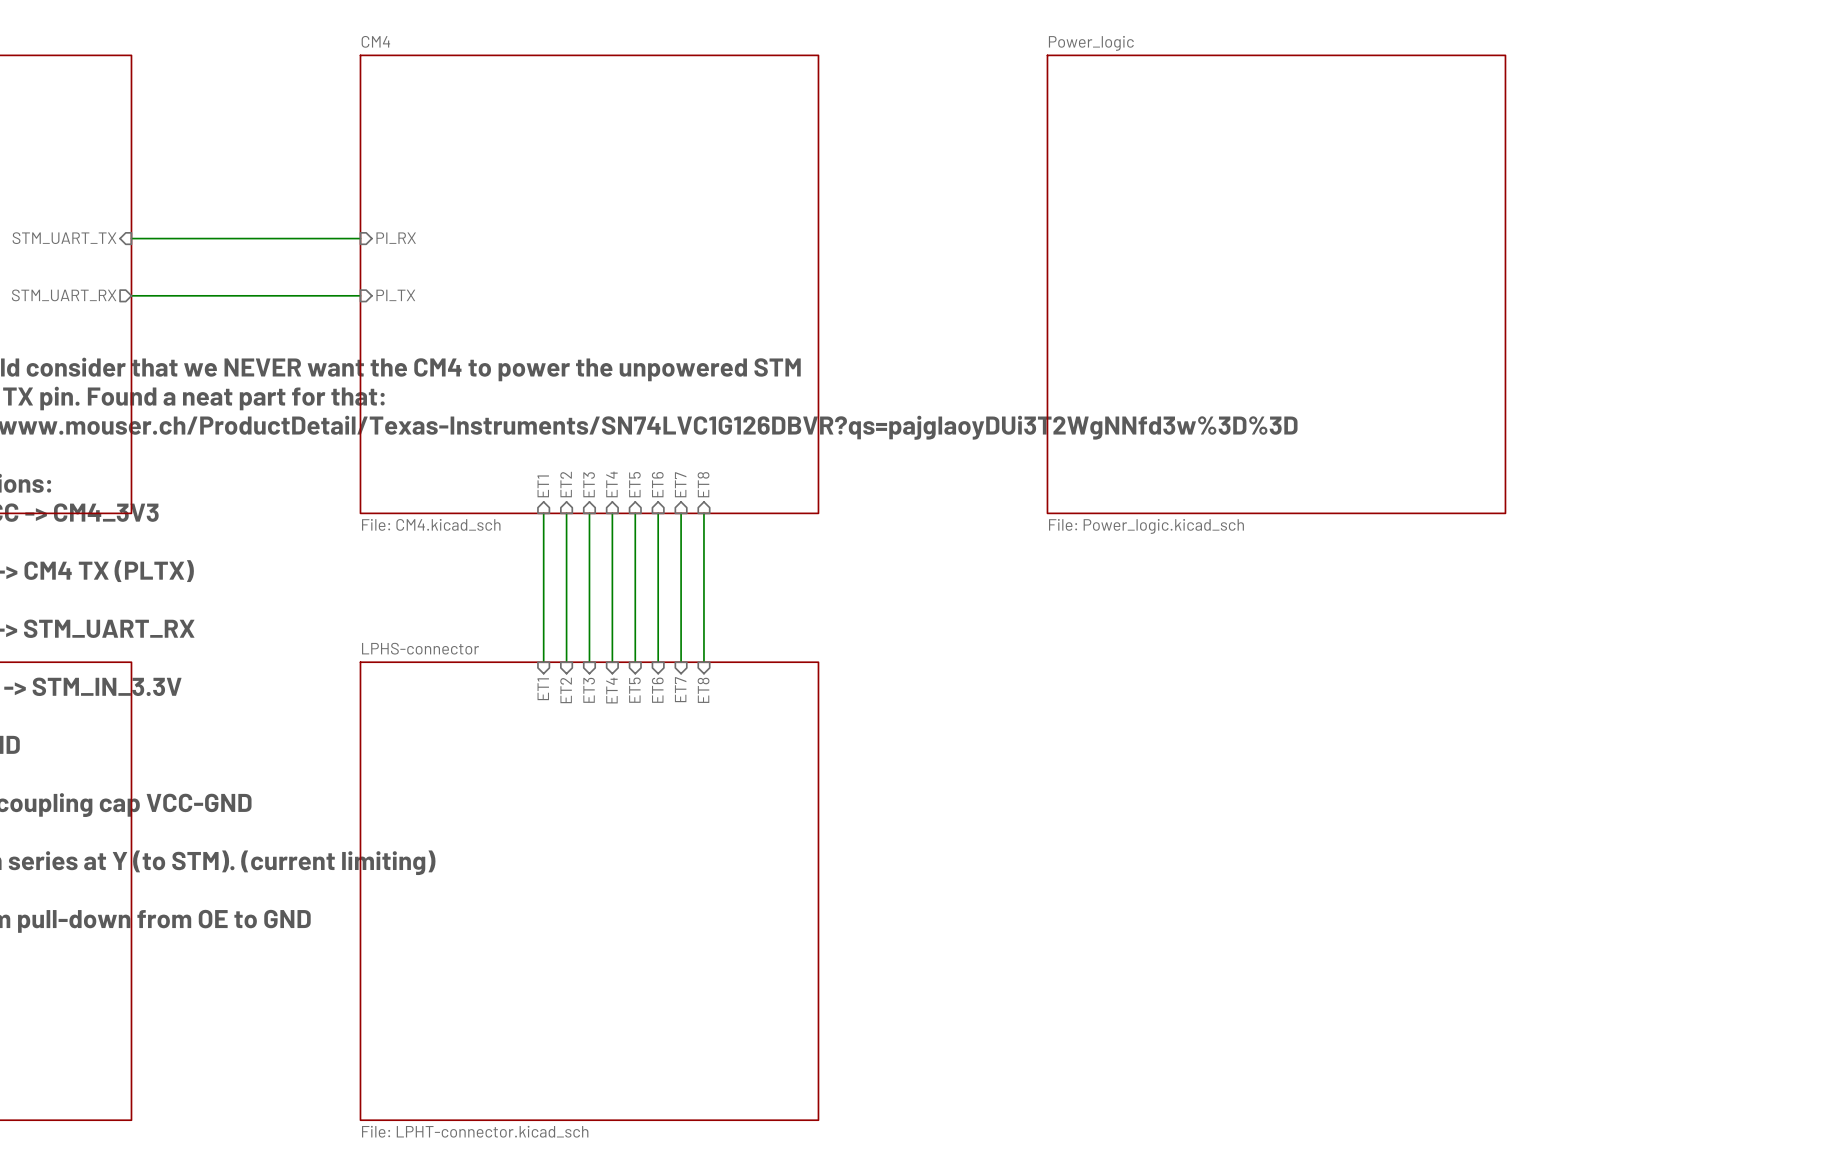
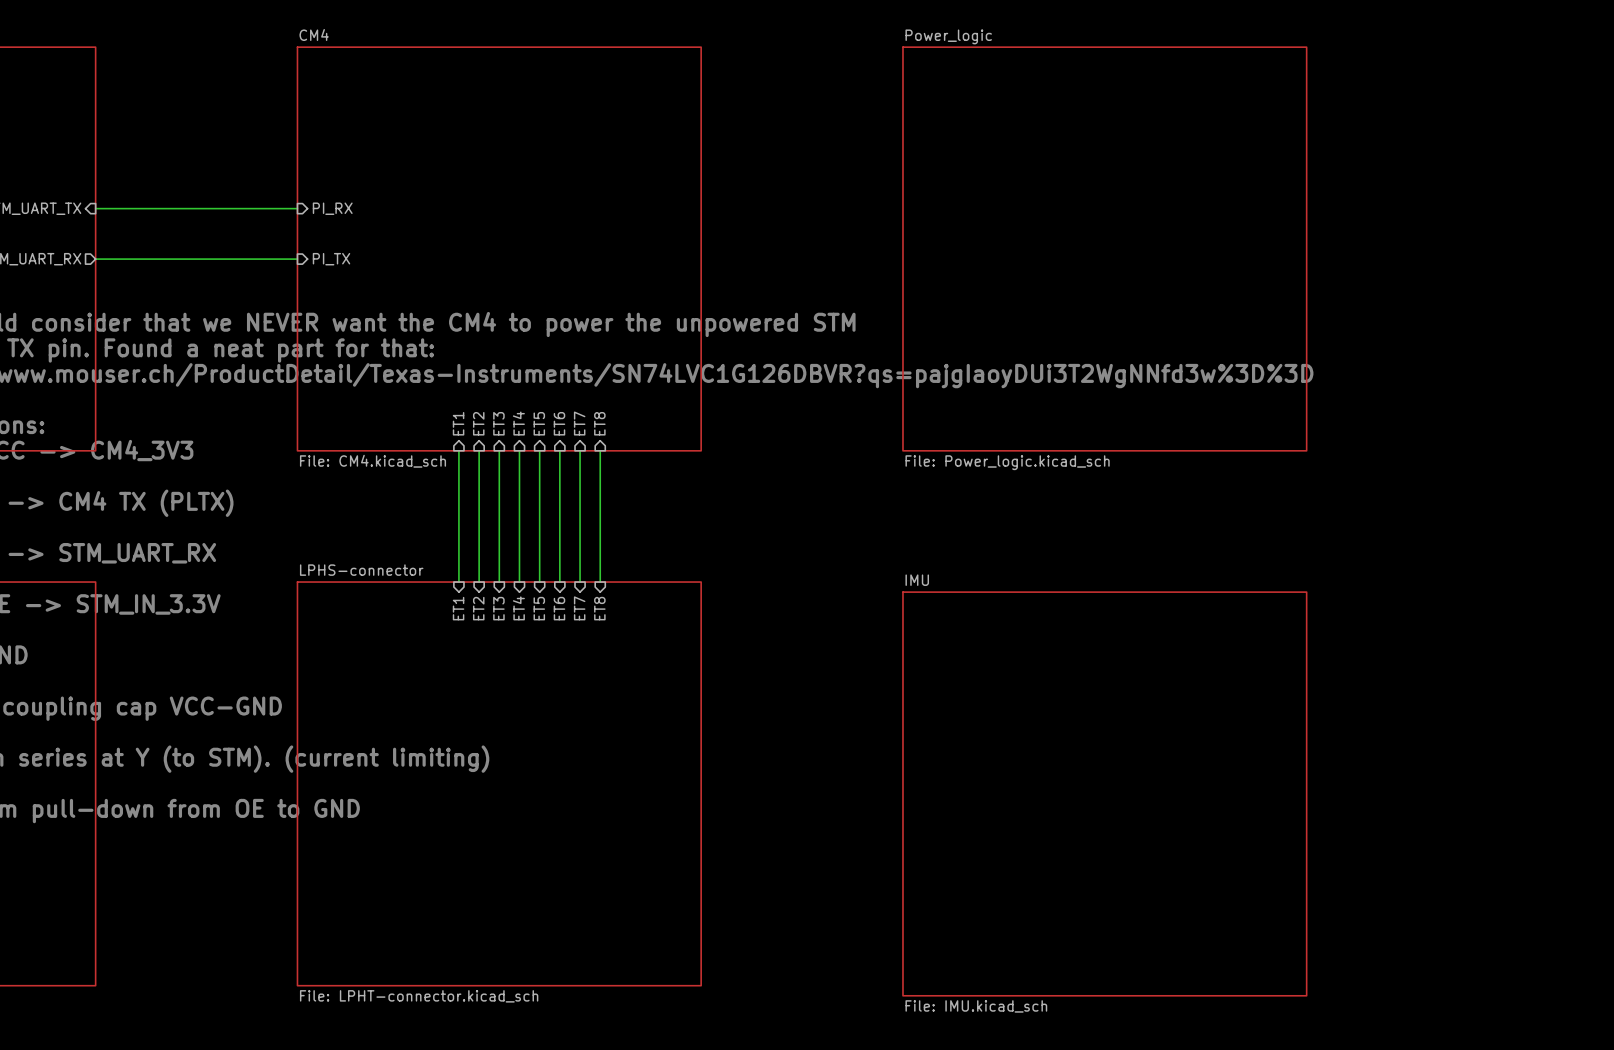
sheet IMU: none -> File: IMU.kicad_sch (1104, 793)

